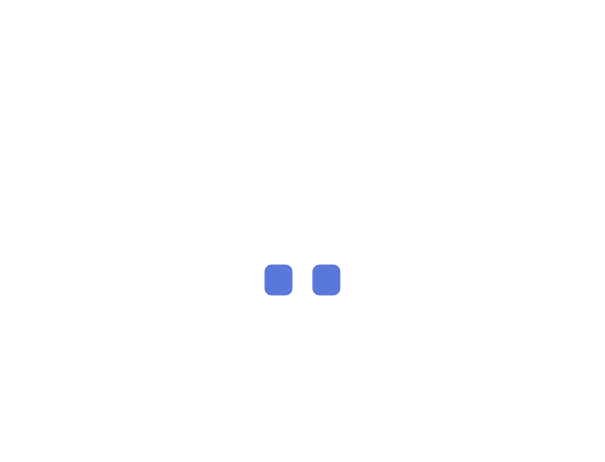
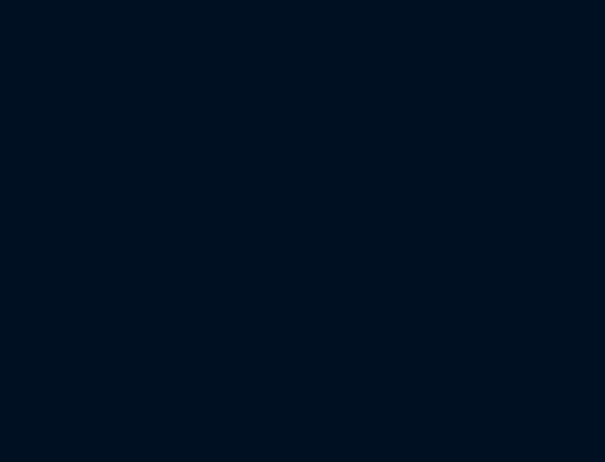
part: (302, 279) -> none

